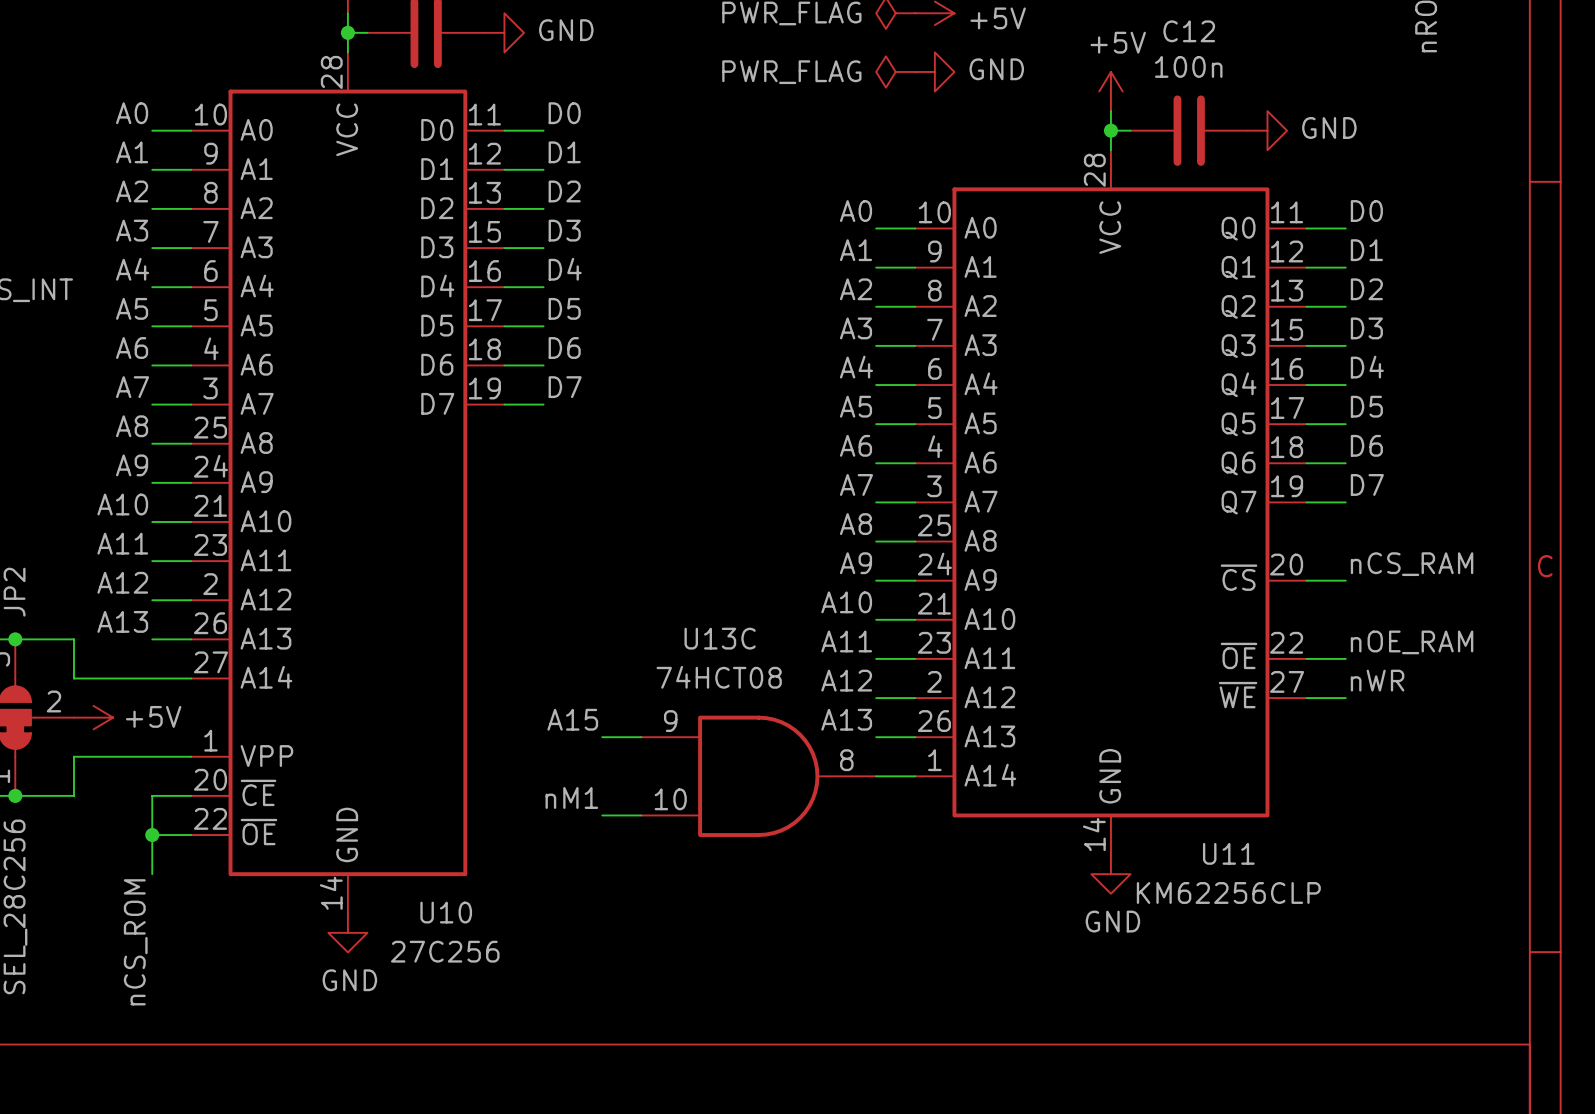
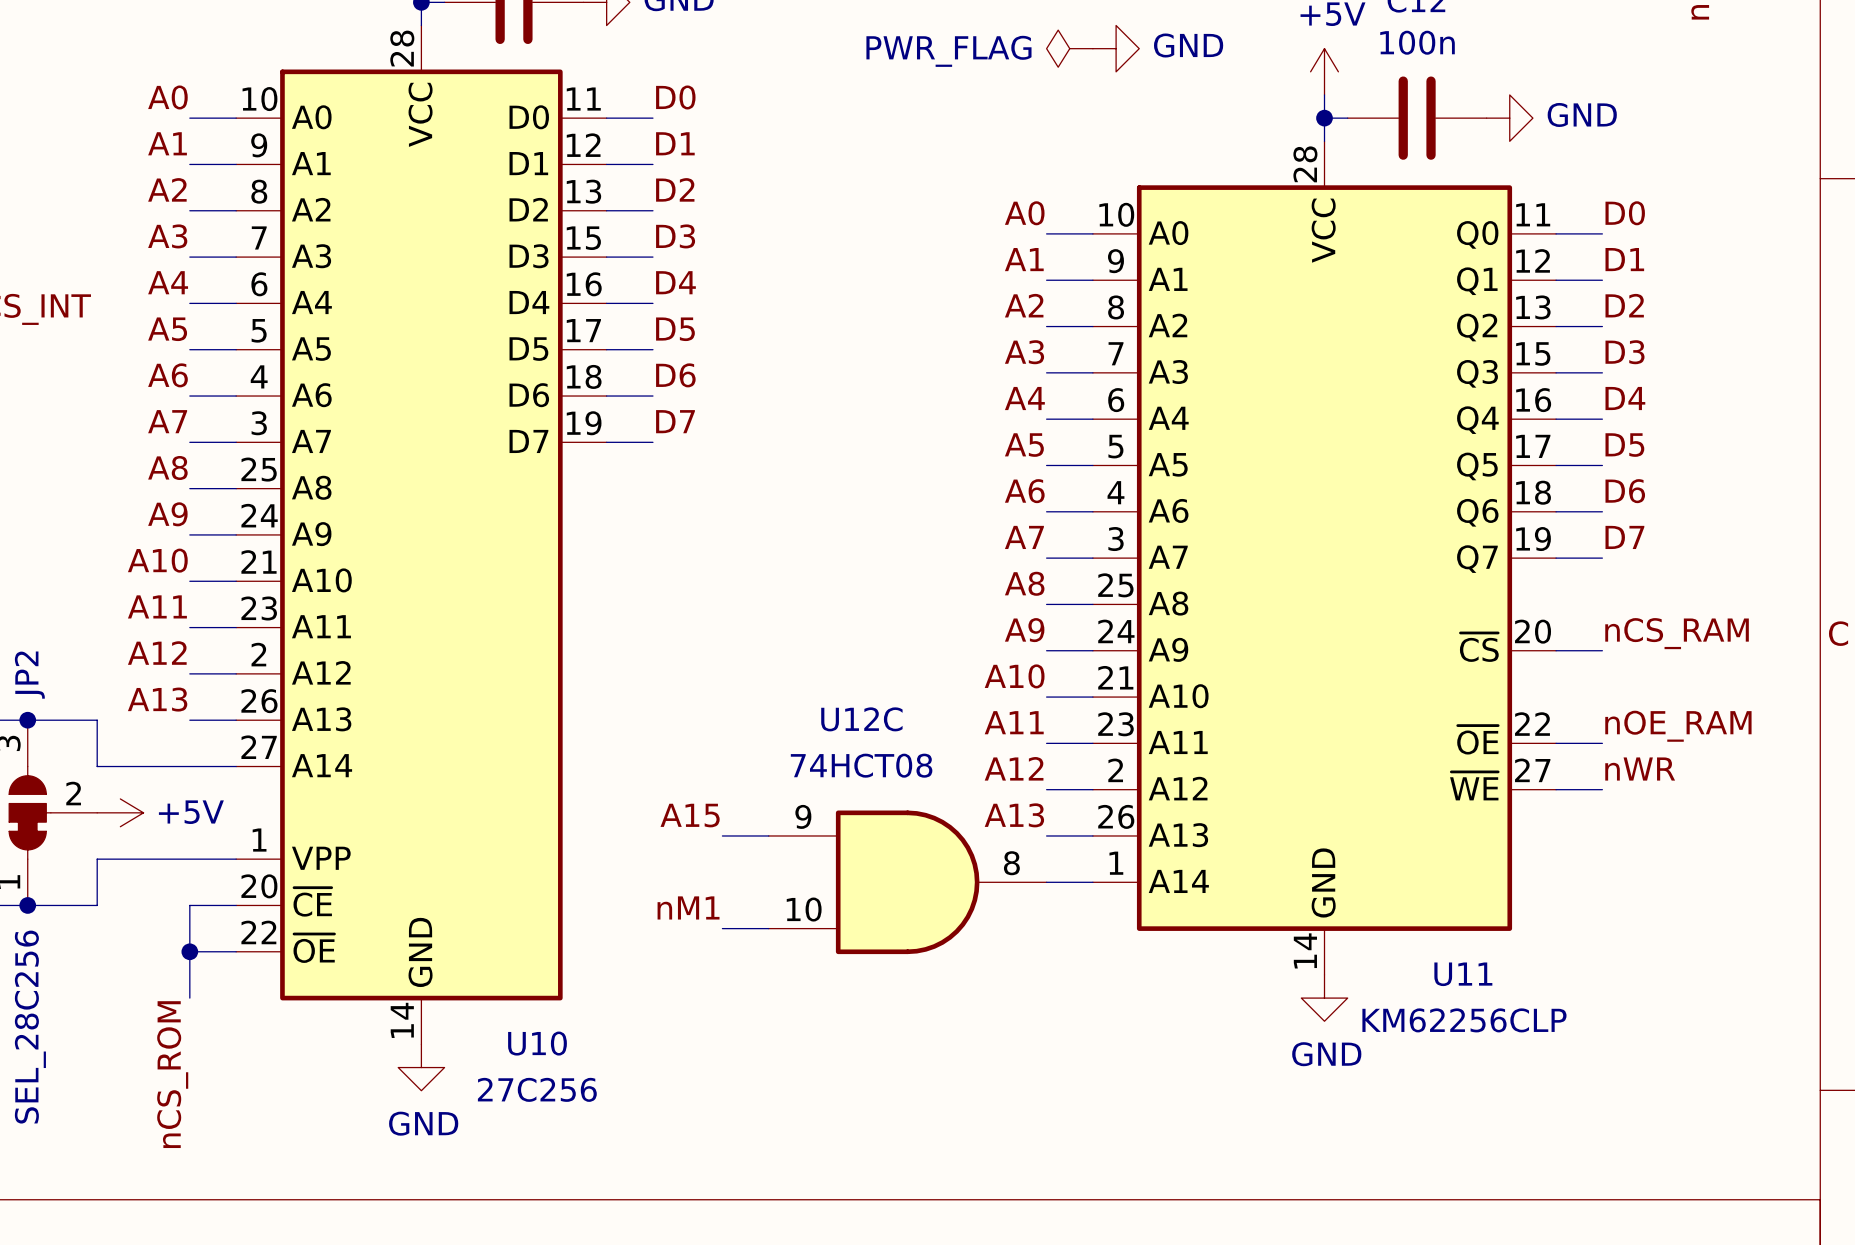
U13C name: U13C (720, 638) -> U12C (861, 719)

